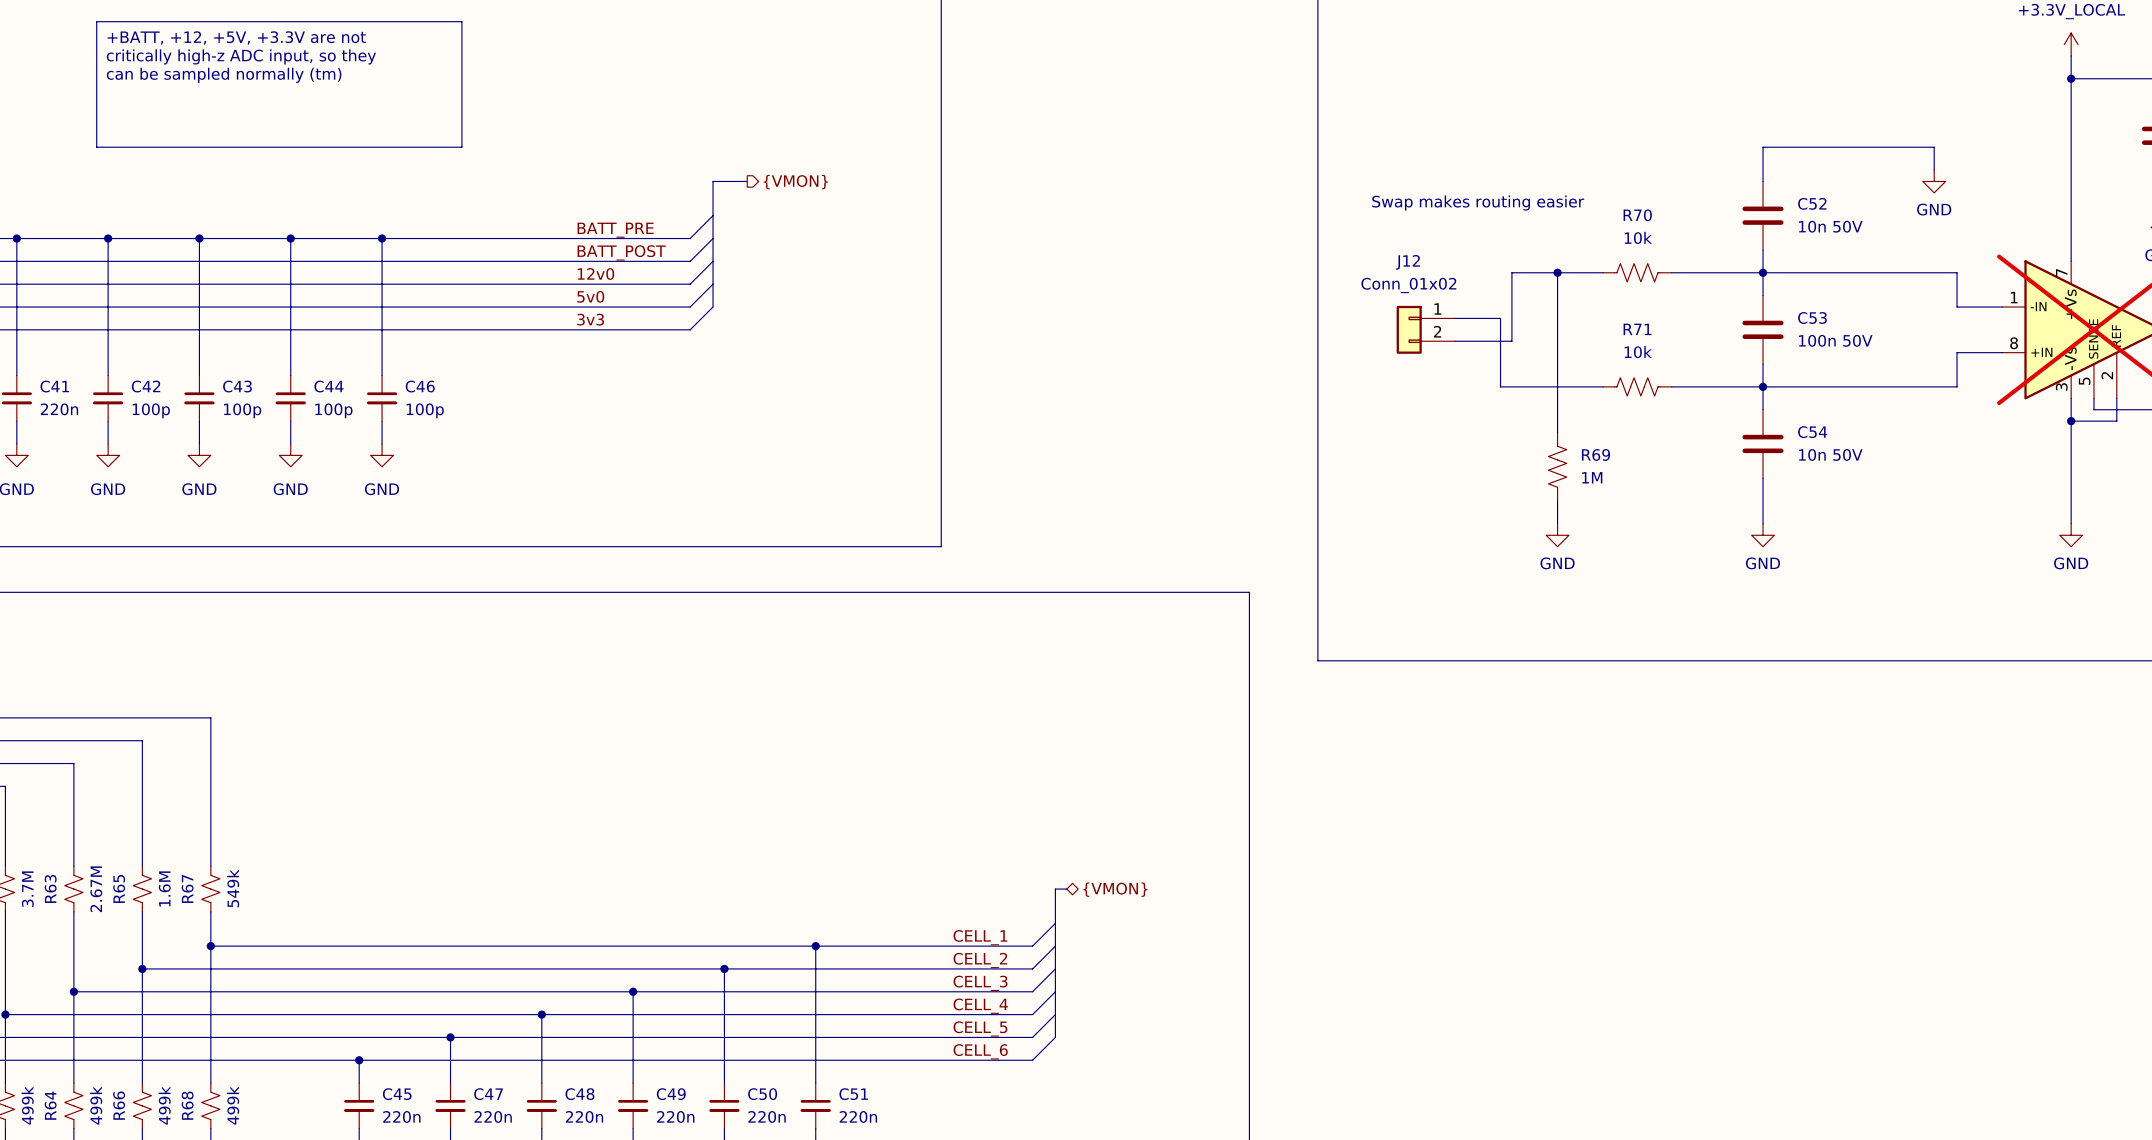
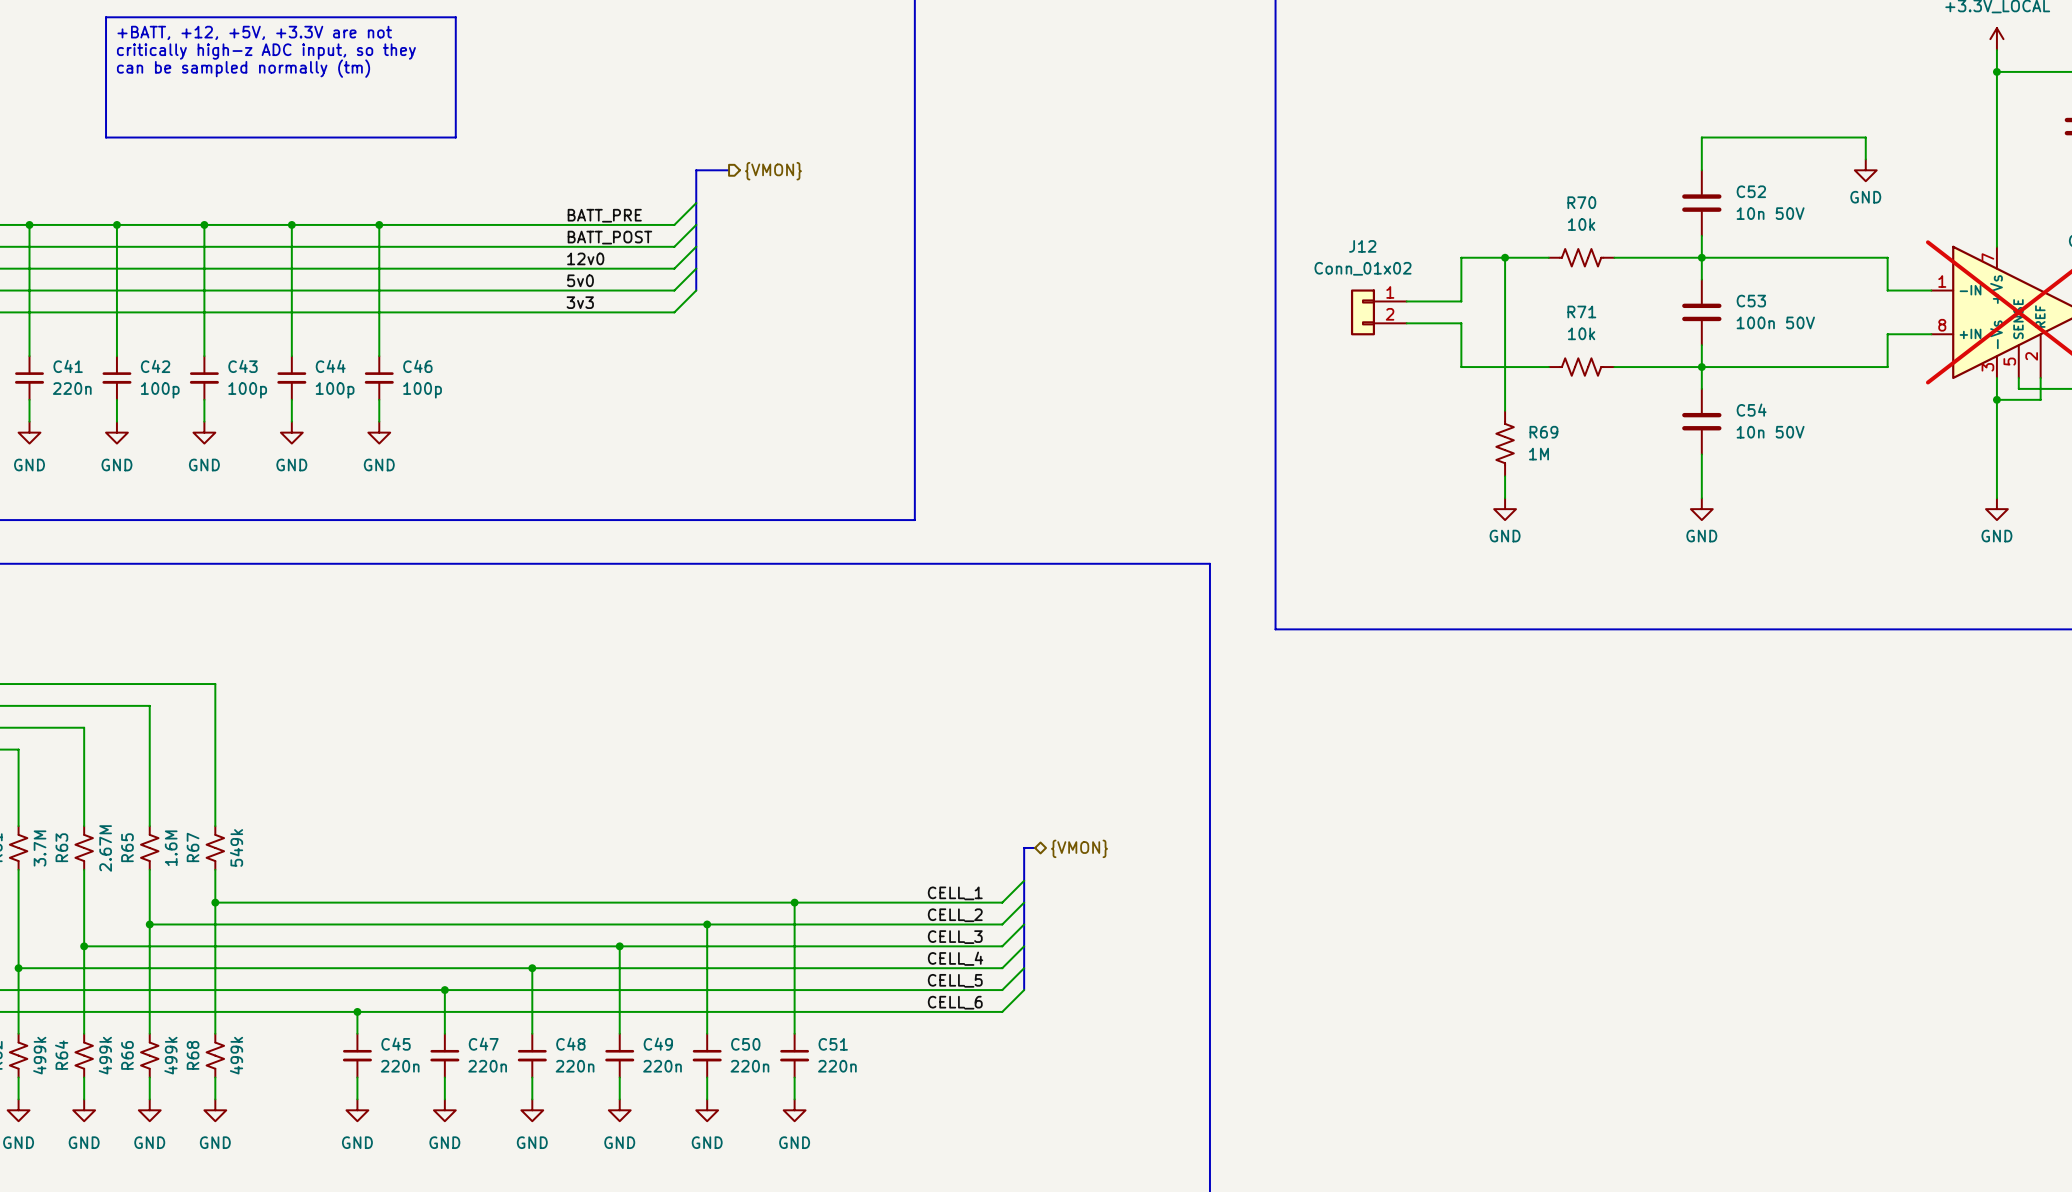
text: Swap makes routing easier (1478, 203) -> none
wire: (1500, 318) (1500, 386) (1511, 386) -> (1461, 323) (1461, 367)
wire: (1511, 318) (1511, 341) -> (1461, 301) (1450, 301)

